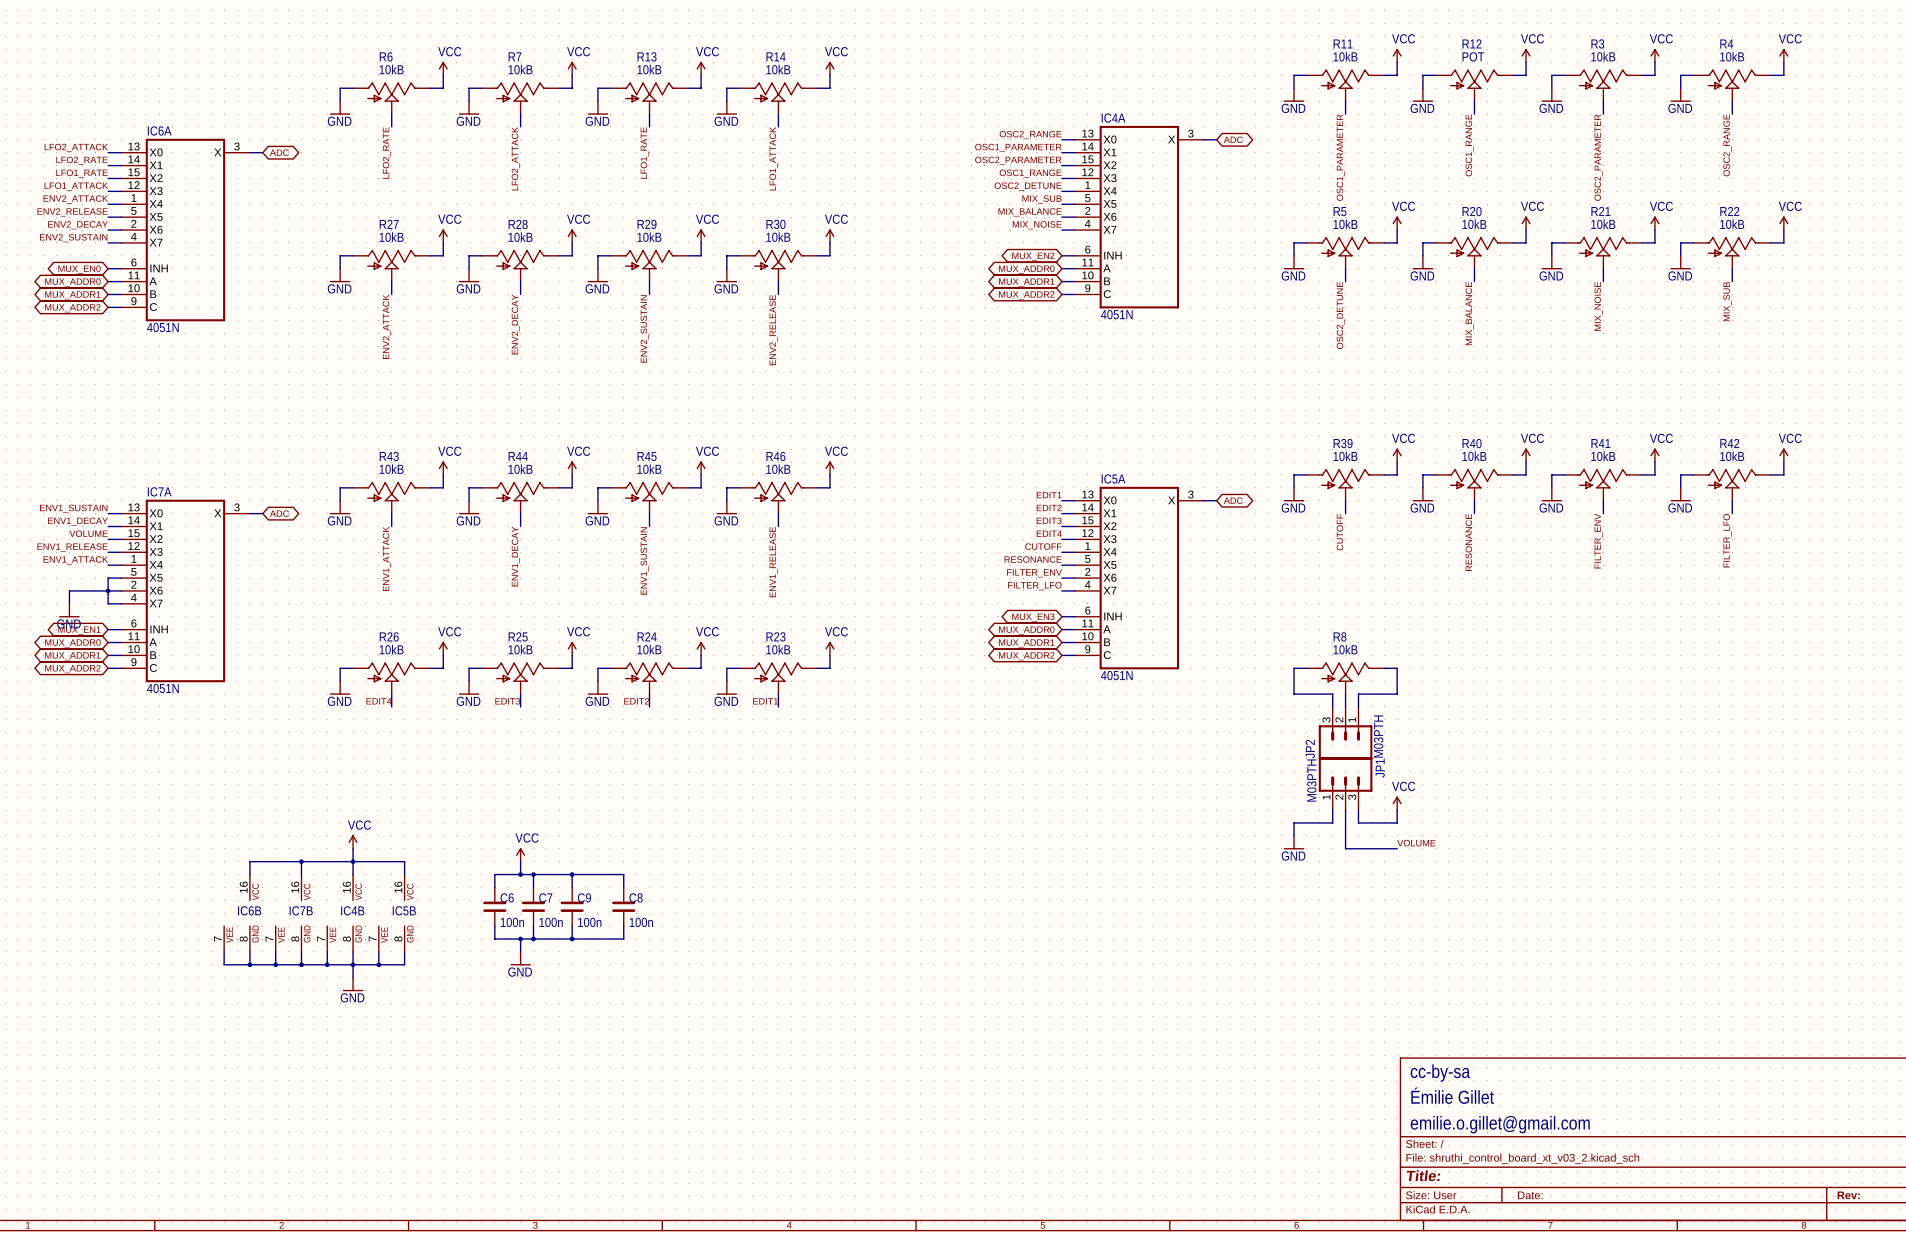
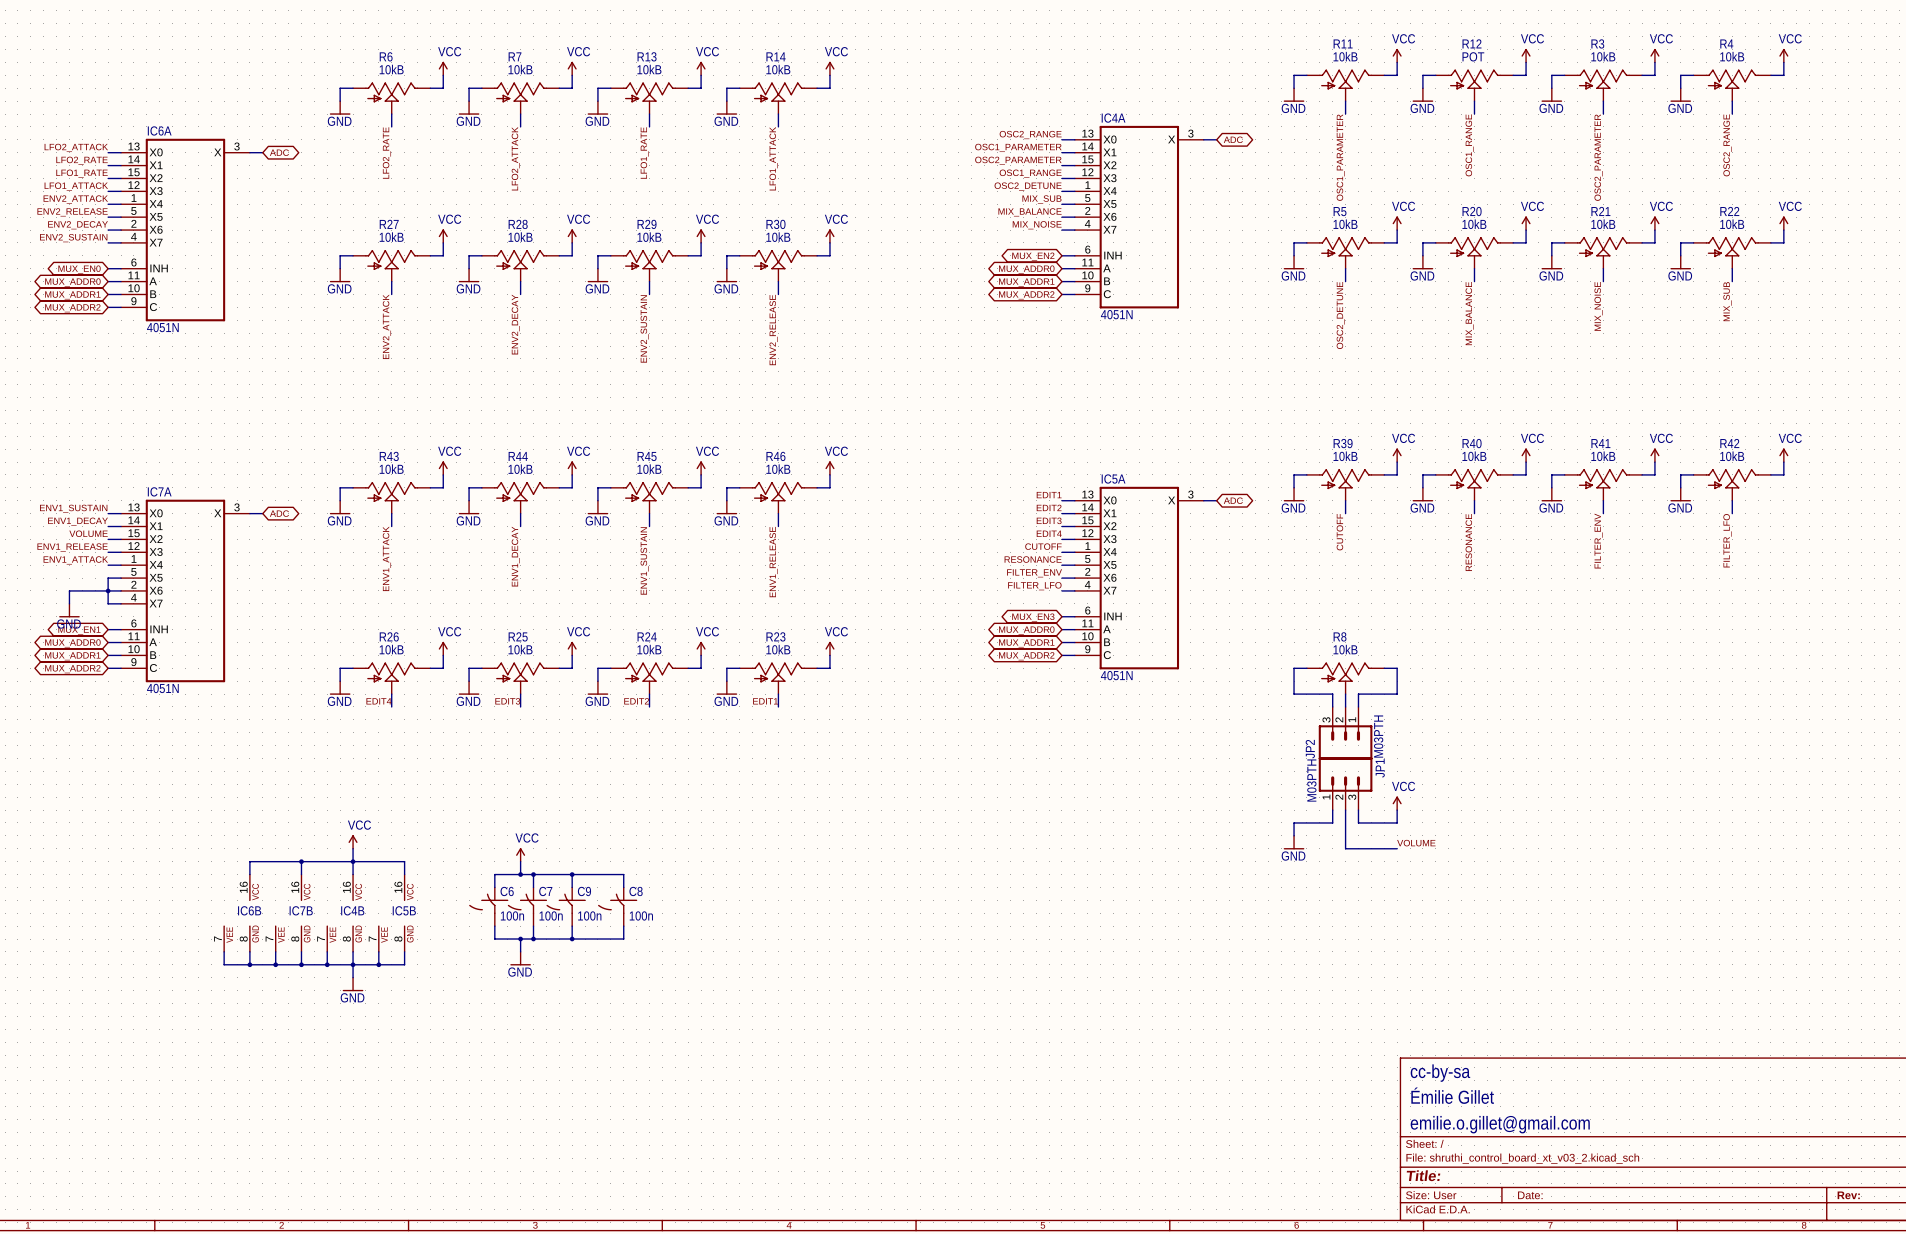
C6 symbol: [483, 887, 507, 927] -> [469, 887, 509, 927]
C7 symbol: [521, 887, 546, 927] -> [507, 887, 548, 927]
C9 symbol: [560, 887, 584, 927] -> [546, 887, 586, 927]
C8 symbol: [612, 887, 636, 927] -> [598, 887, 638, 927]

